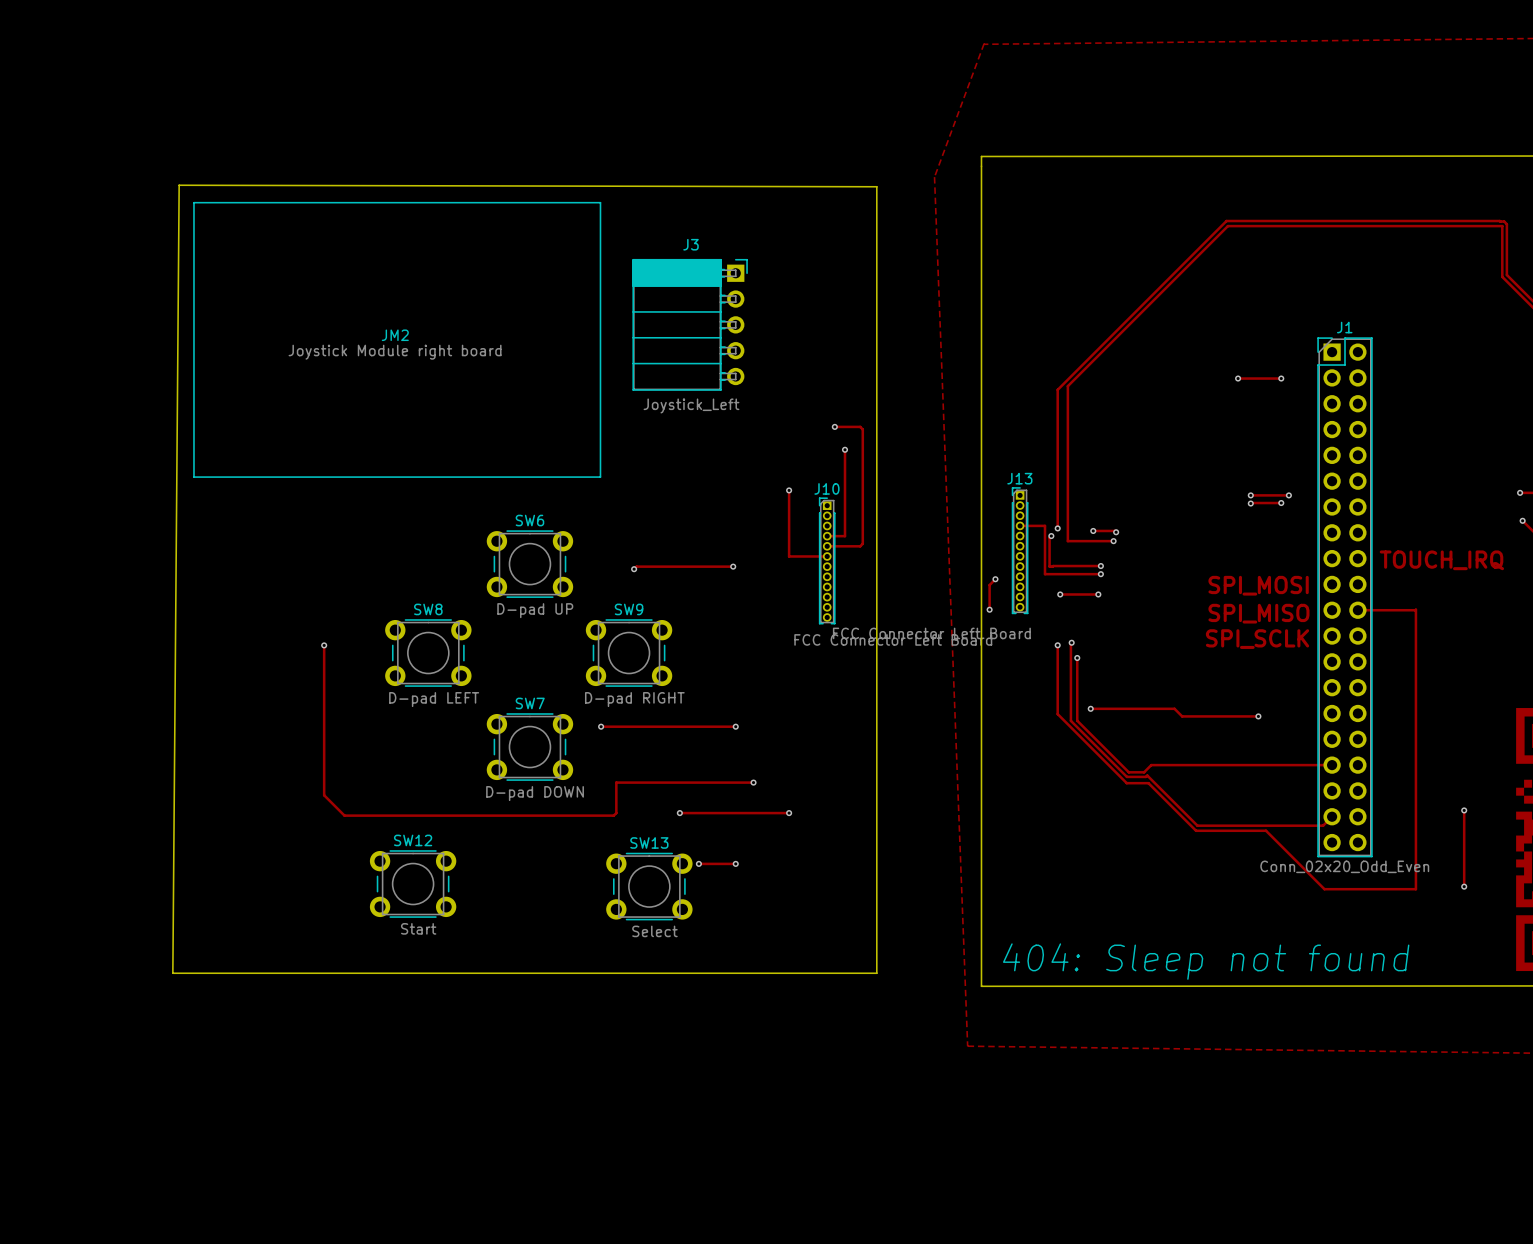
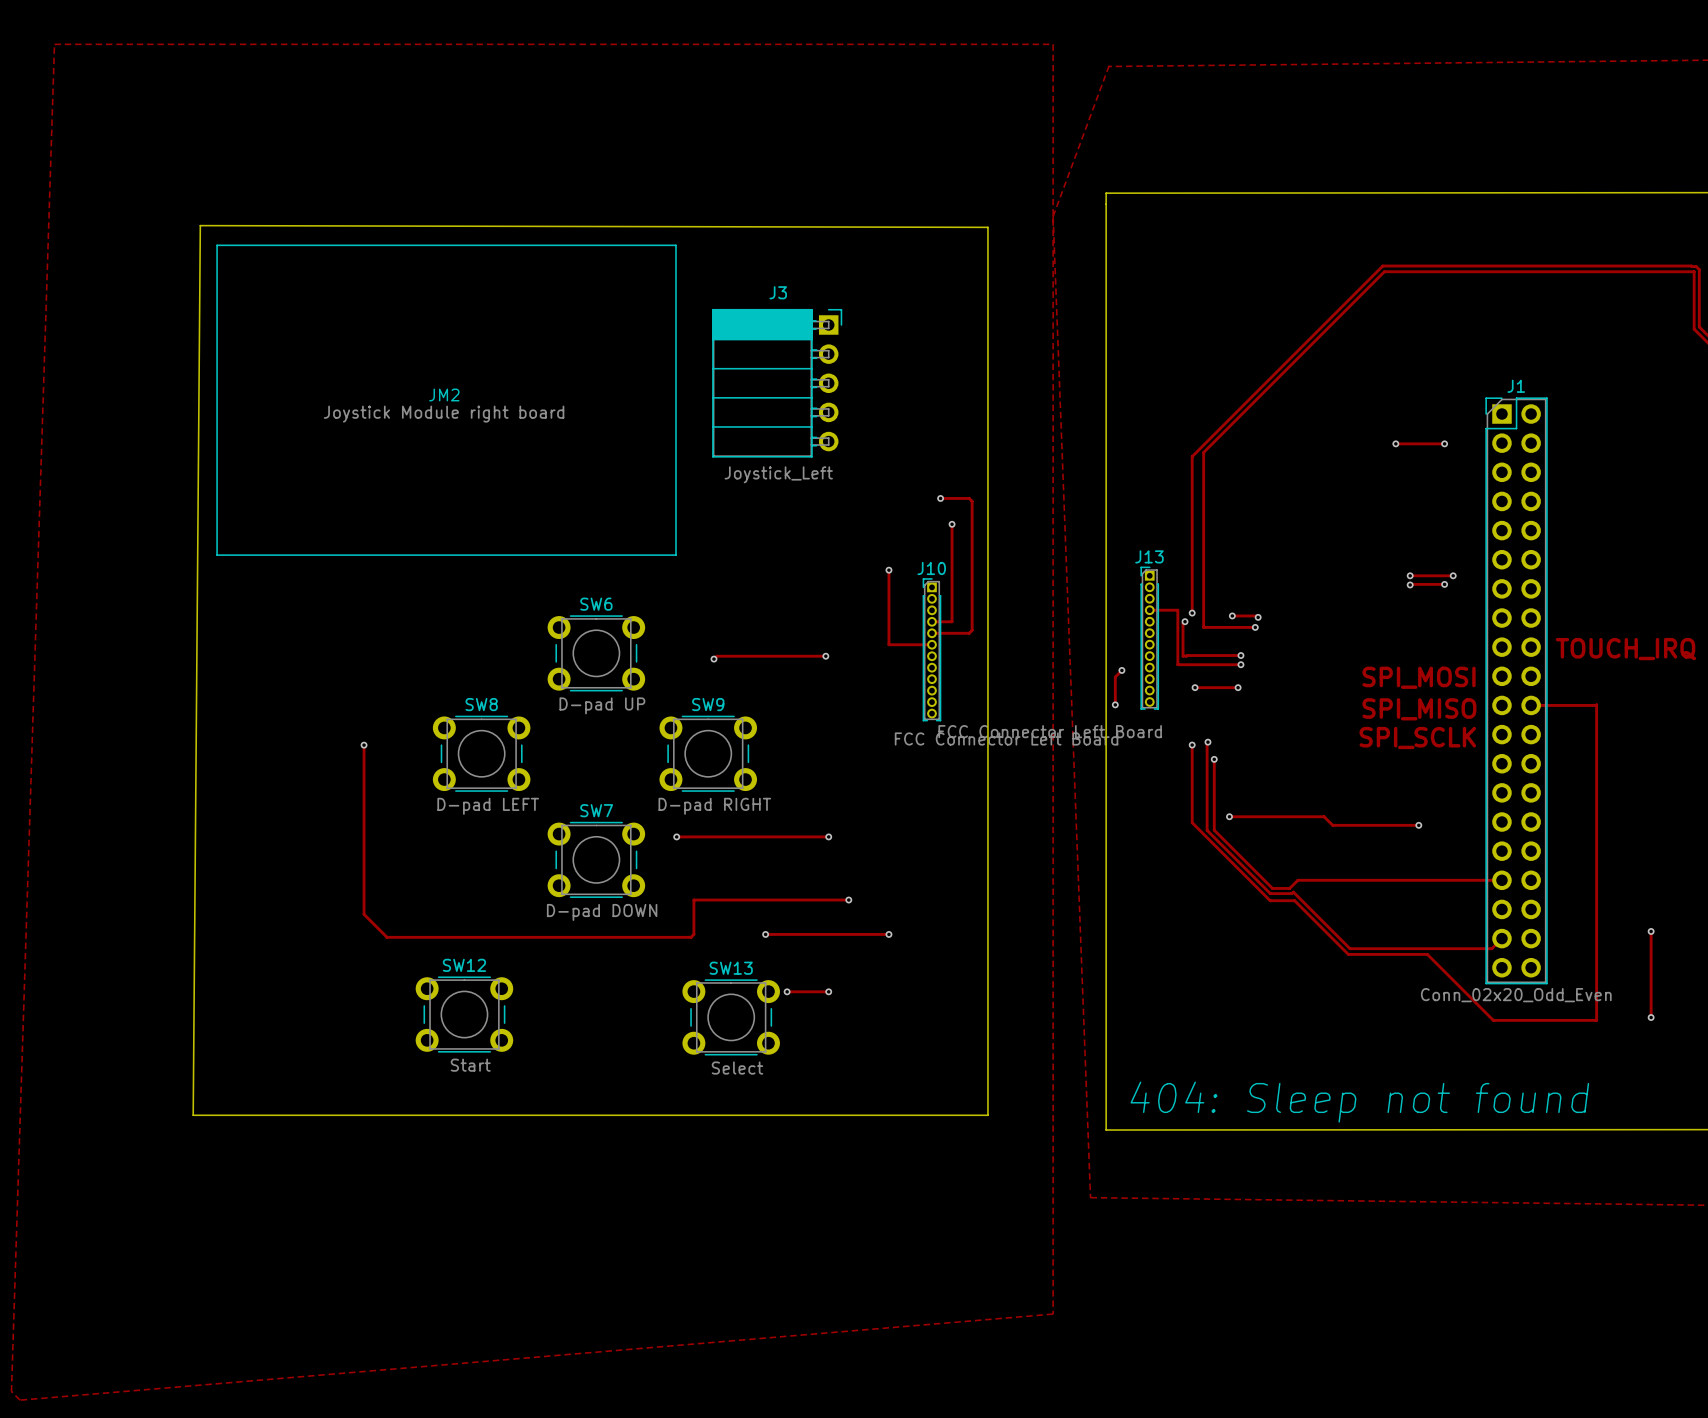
zone outline: none -> (54, 44) (11, 1391) (20, 1400) (1053, 1314) (1053, 44) (54, 44)

